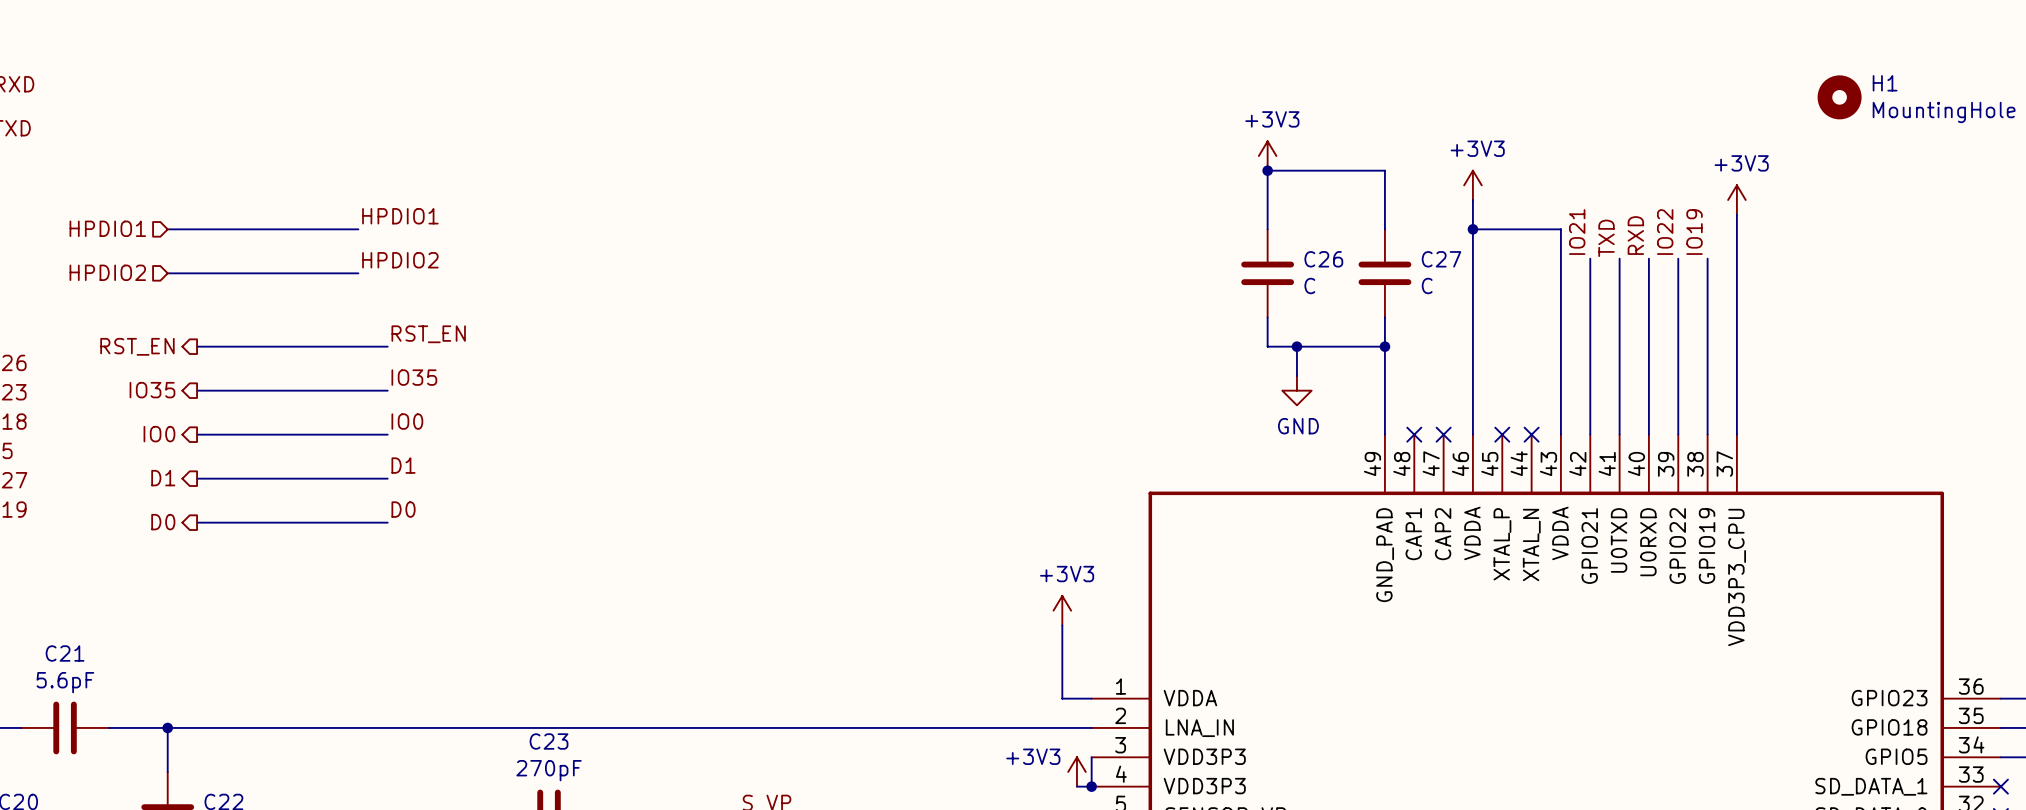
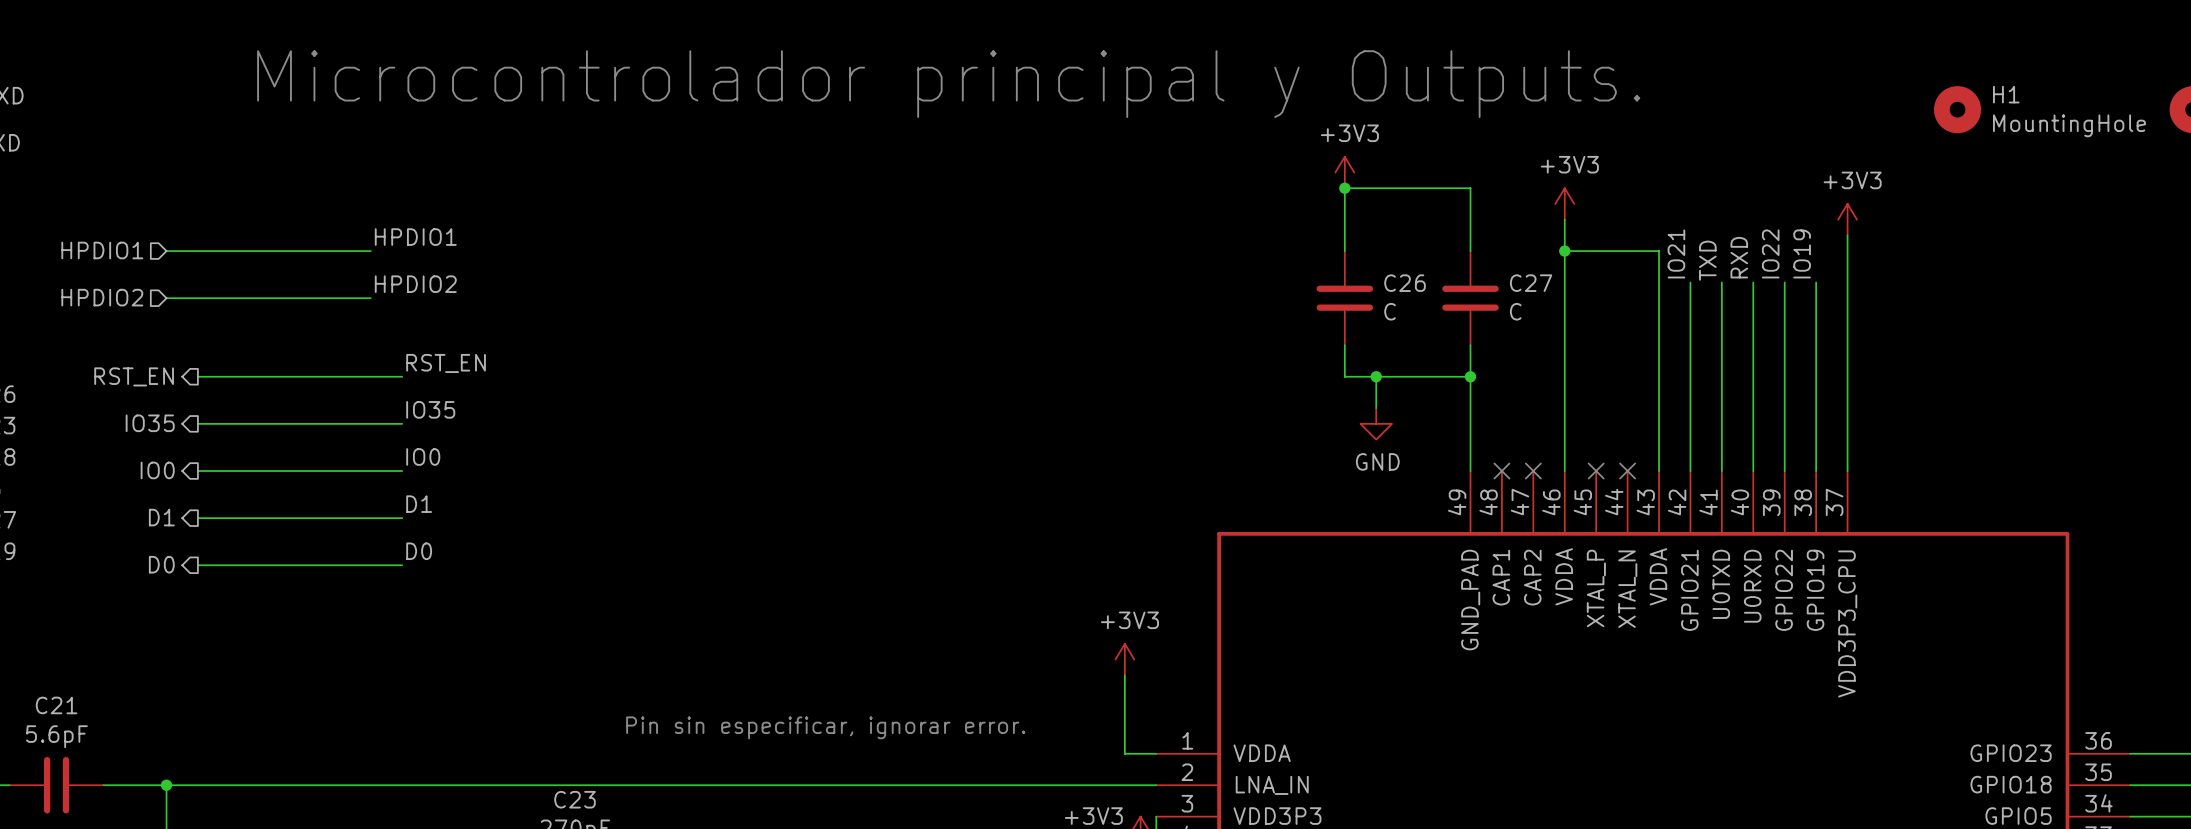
text: none -> Microcontrolador principal y Outputs. (948, 84)
text: none -> Pin sin especificar, ignorar error. (825, 727)

